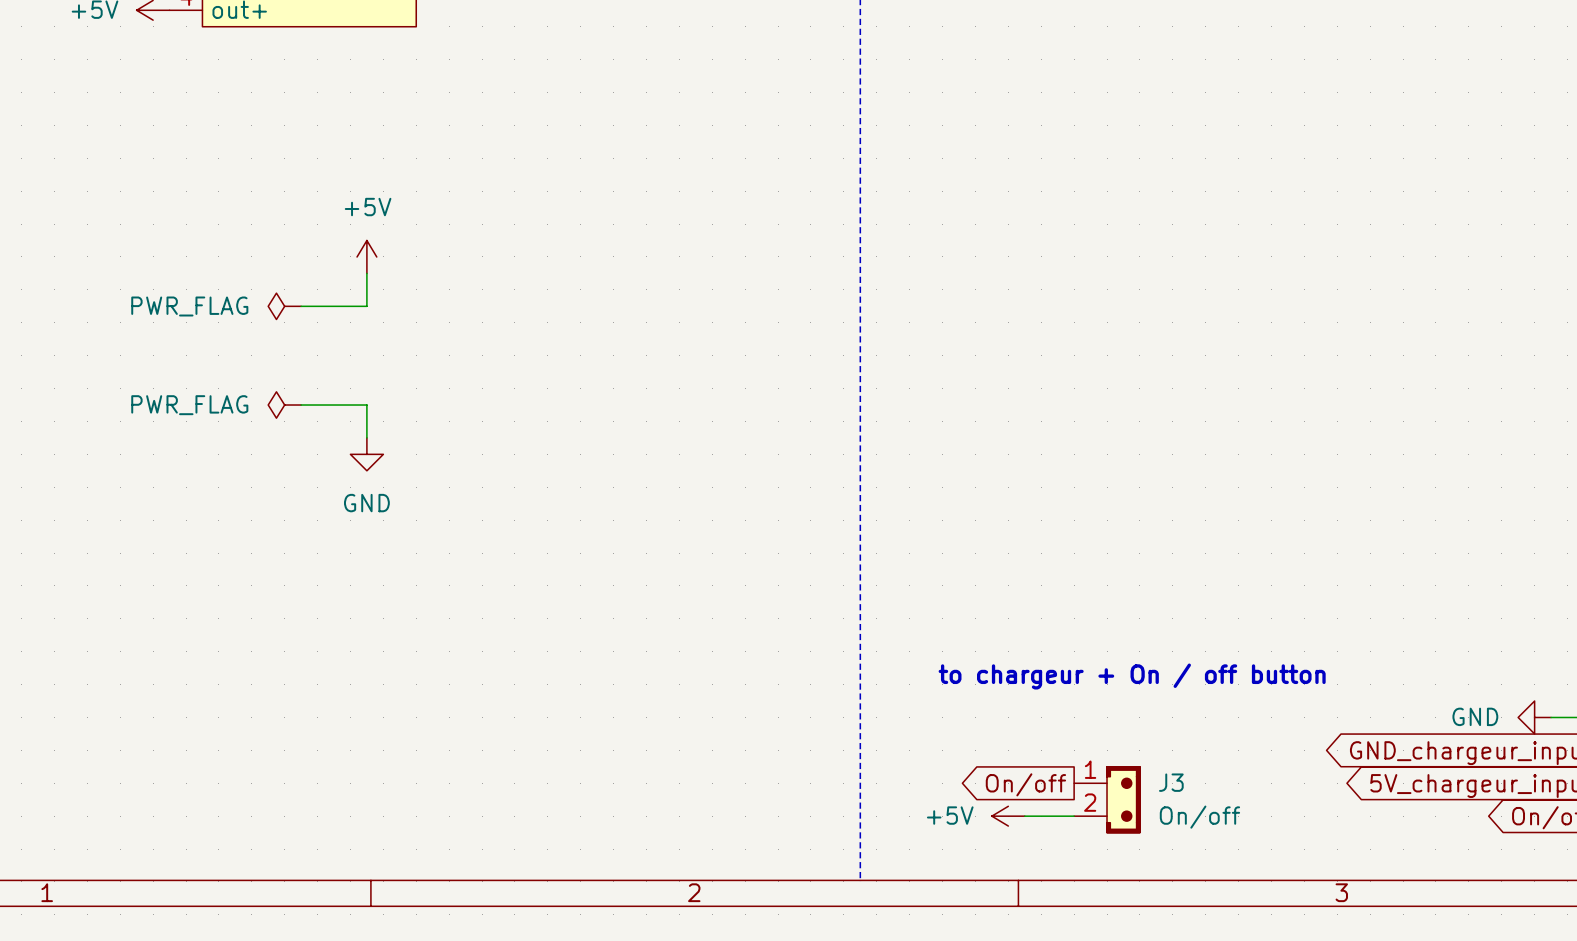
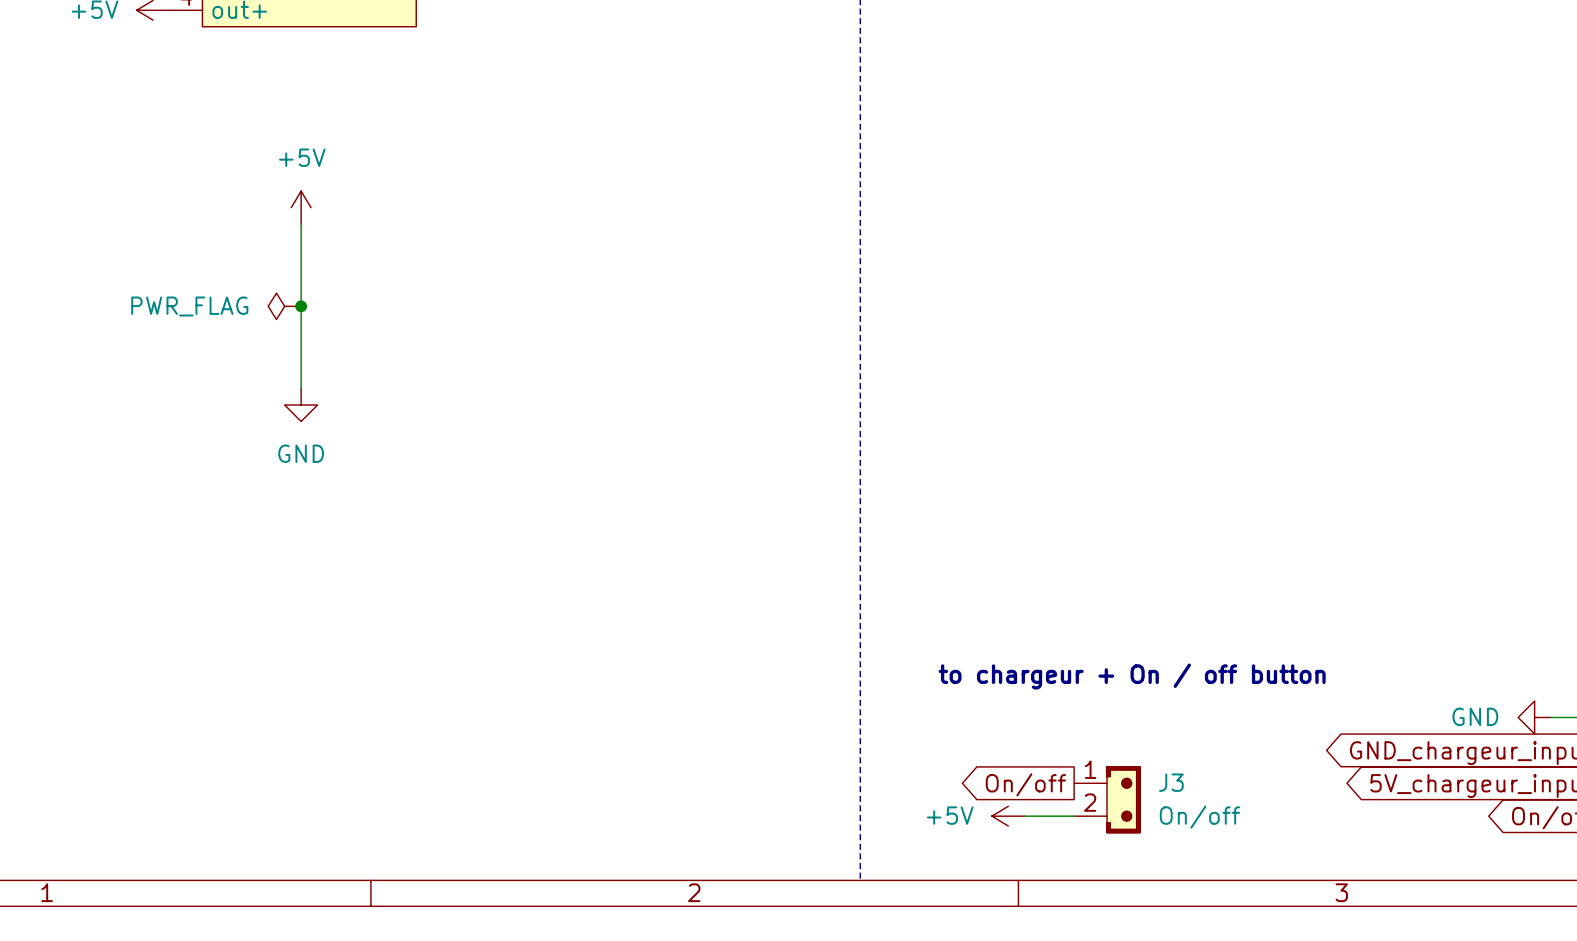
wire: none -> (301, 224) (301, 388)
power symbol position: +5V (366, 256) -> +5V (301, 207)
wire: (366, 273) (366, 306) (301, 306) -> none
junction: none -> (301, 306)
power symbol: PWR_FLAG (284, 405) -> none
wire: (301, 405) (366, 405) (366, 437) -> none
power symbol position: GND (366, 454) -> GND (301, 405)

